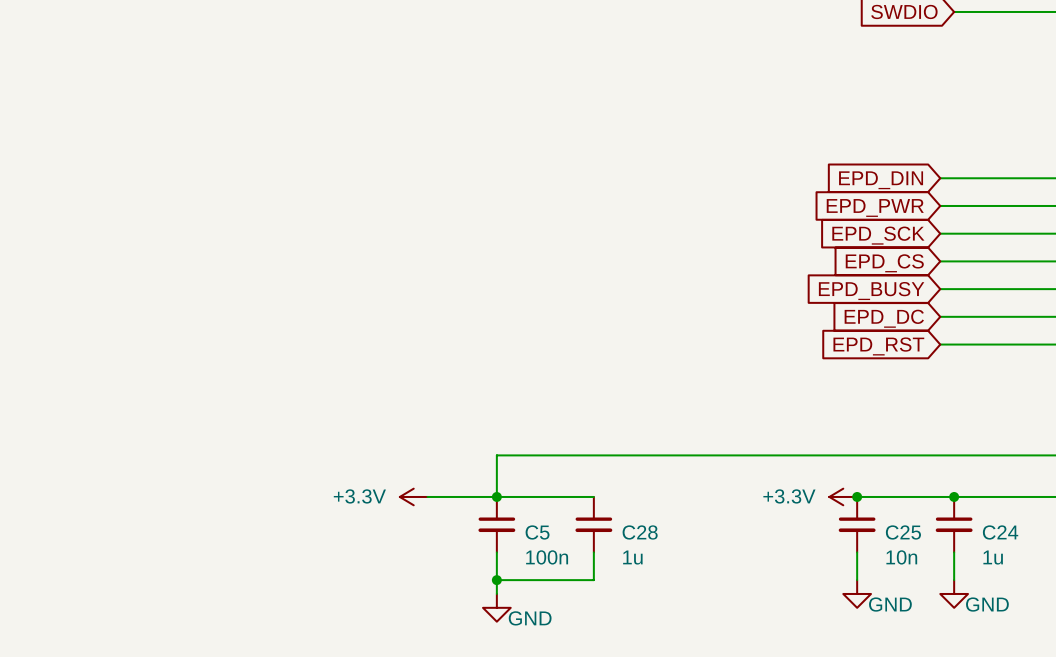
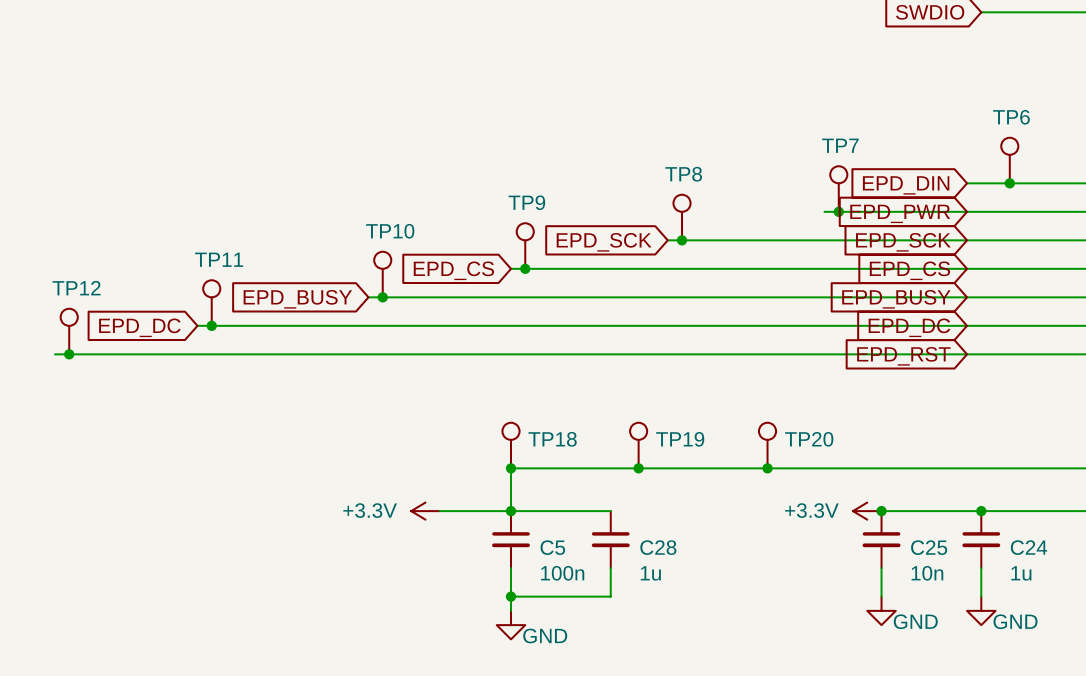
TP6: none -> (1009, 160)
junction: none -> (1009, 183)
TP7: none -> (838, 189)
wire: none -> (824, 211) (967, 211)
junction: none -> (838, 211)
TP8: none -> (682, 217)
wire: none -> (667, 240) (967, 240)
junction: none -> (682, 240)
global label: none -> EPD_SCK (604, 242)
TP9: none -> (525, 246)
wire: none -> (511, 268) (967, 268)
junction: none -> (525, 268)
global label: none -> EPD_CS (453, 270)
TP10: none -> (382, 274)
wire: none -> (368, 297) (967, 297)
junction: none -> (382, 297)
global label: none -> EPD_BUSY (297, 299)
TP11: none -> (211, 303)
wire: none -> (197, 325) (967, 325)
junction: none -> (211, 325)
global label: none -> EPD_DC (139, 327)
TP12: none -> (69, 331)
wire: none -> (54, 354) (967, 354)
junction: none -> (69, 354)
TP18: none -> (511, 445)
TP19: none -> (638, 445)
TP20: none -> (767, 445)
junction: none -> (511, 468)
junction: none -> (638, 468)
junction: none -> (767, 468)

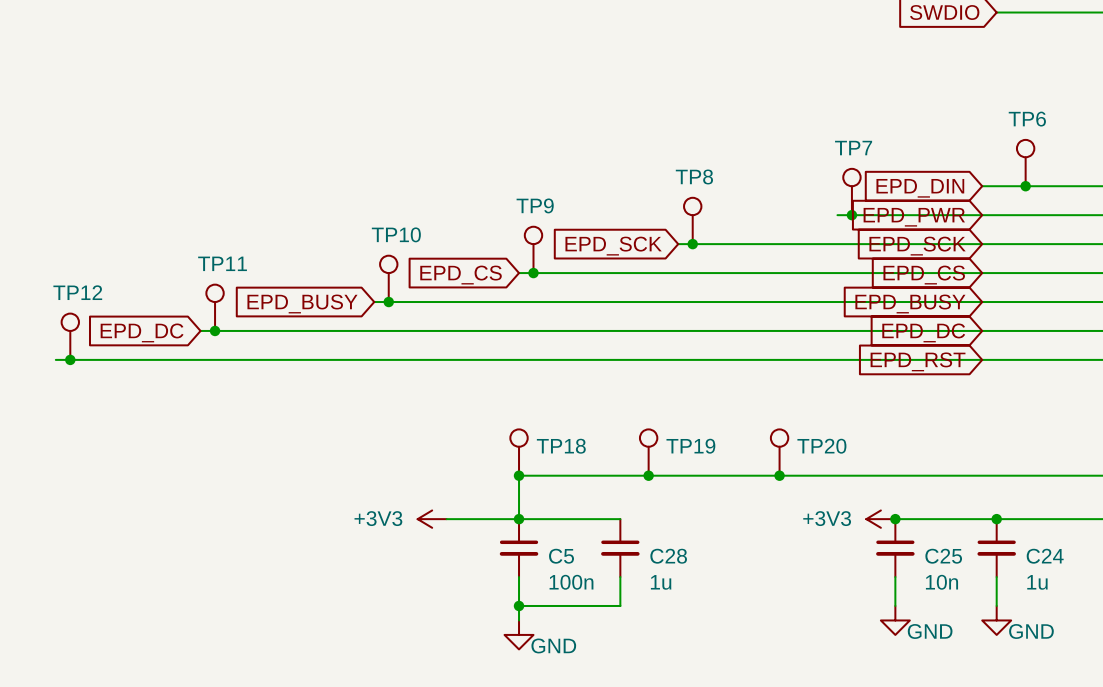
power symbol: +3.3V (425, 511) -> +3V3 (432, 519)
power symbol: +3.3V (867, 511) -> +3V3 (880, 519)

